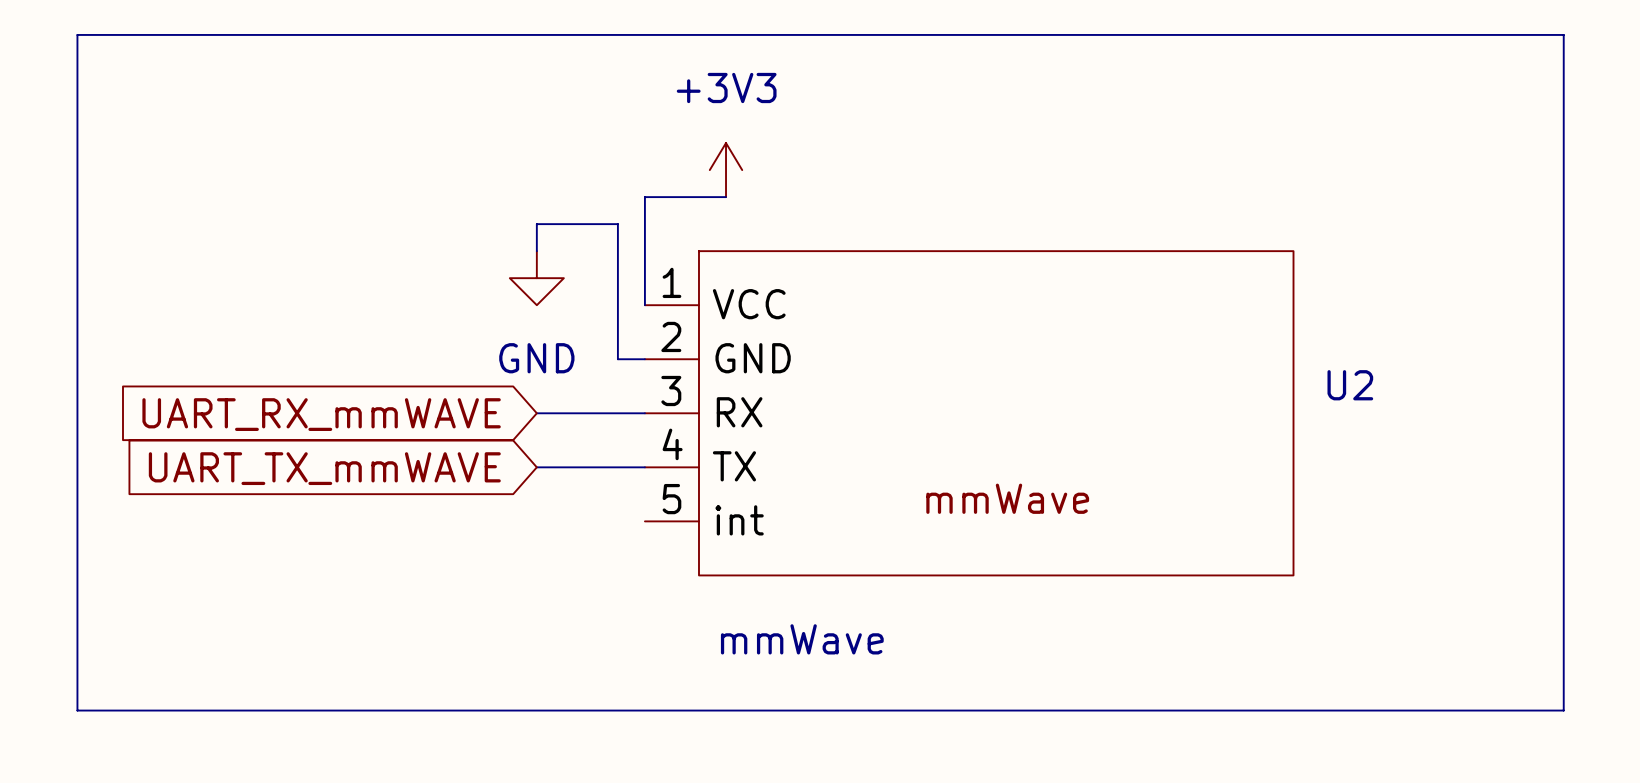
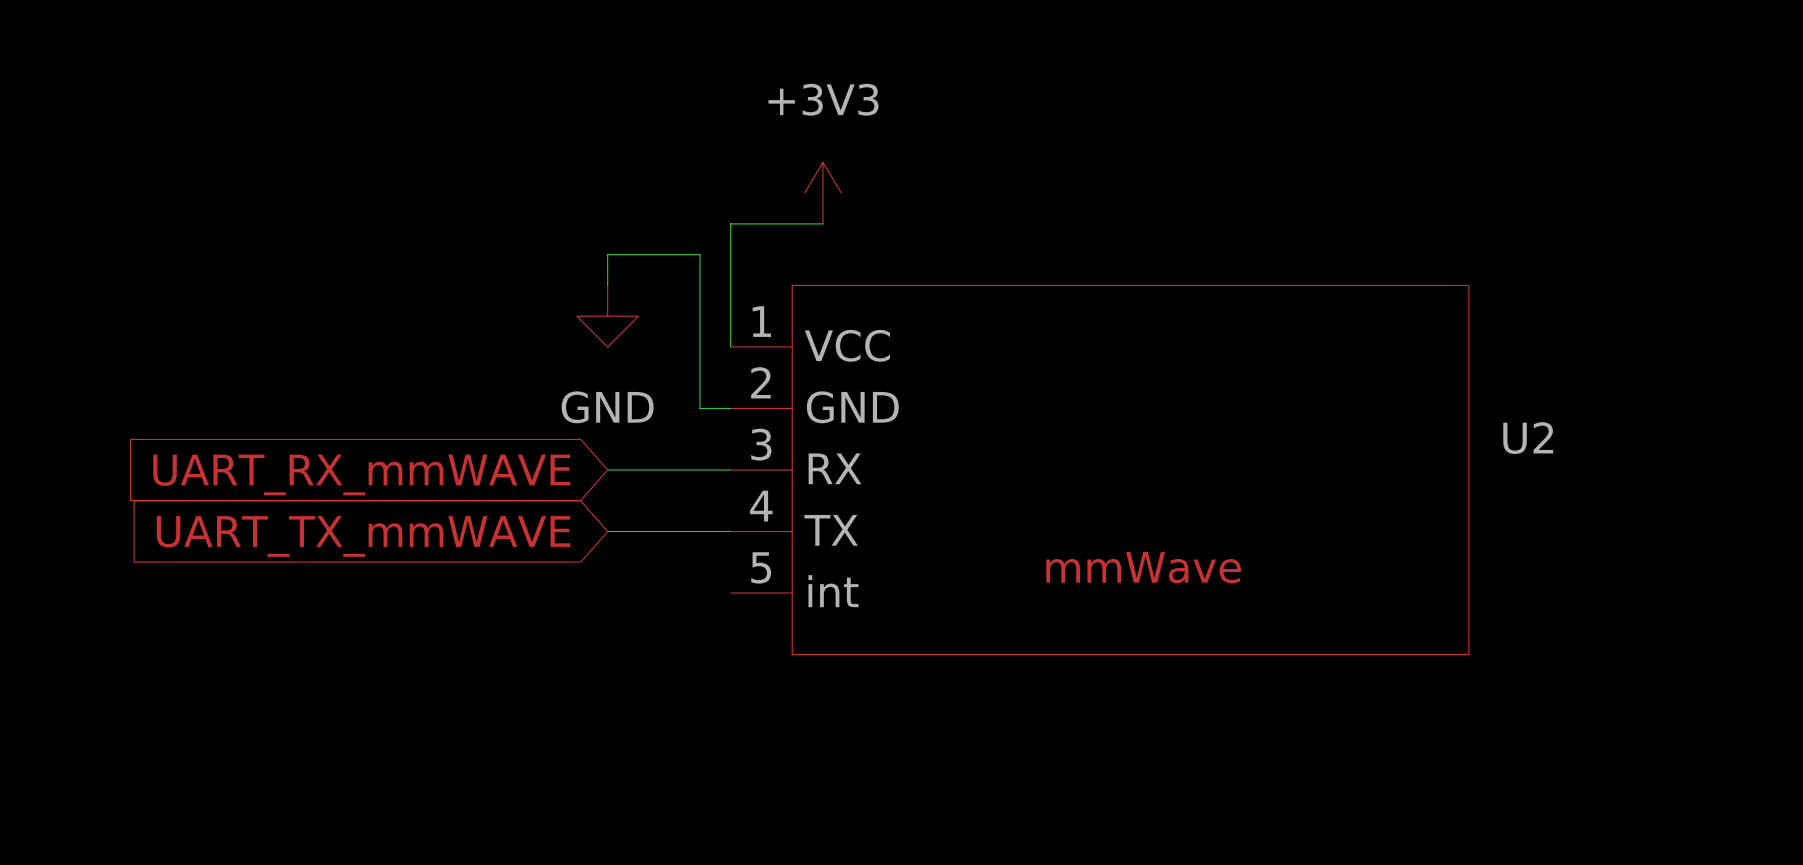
line: (77, 34) (1563, 34) (1563, 710) (77, 710) (77, 34) -> none
text: mmWave (802, 639) -> none

